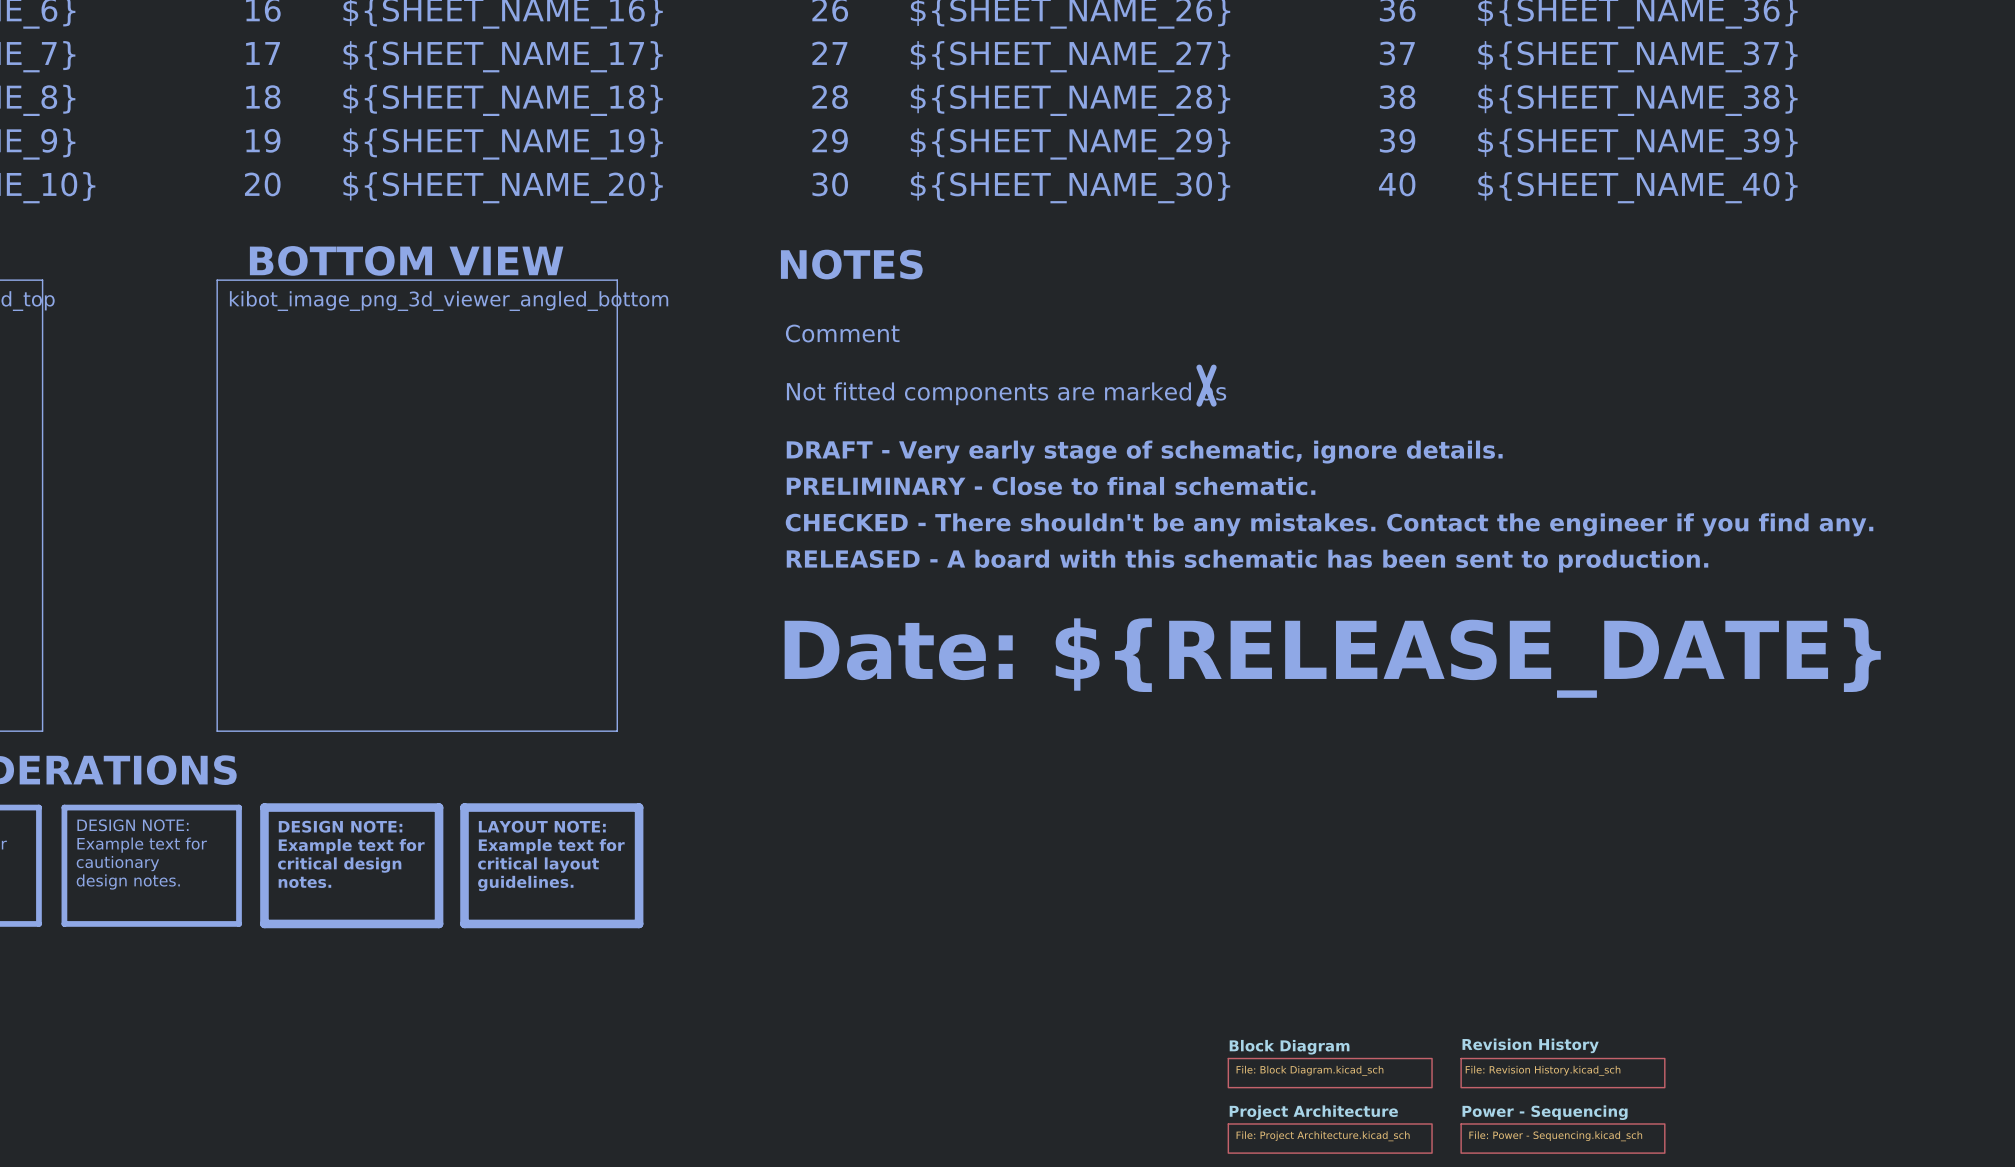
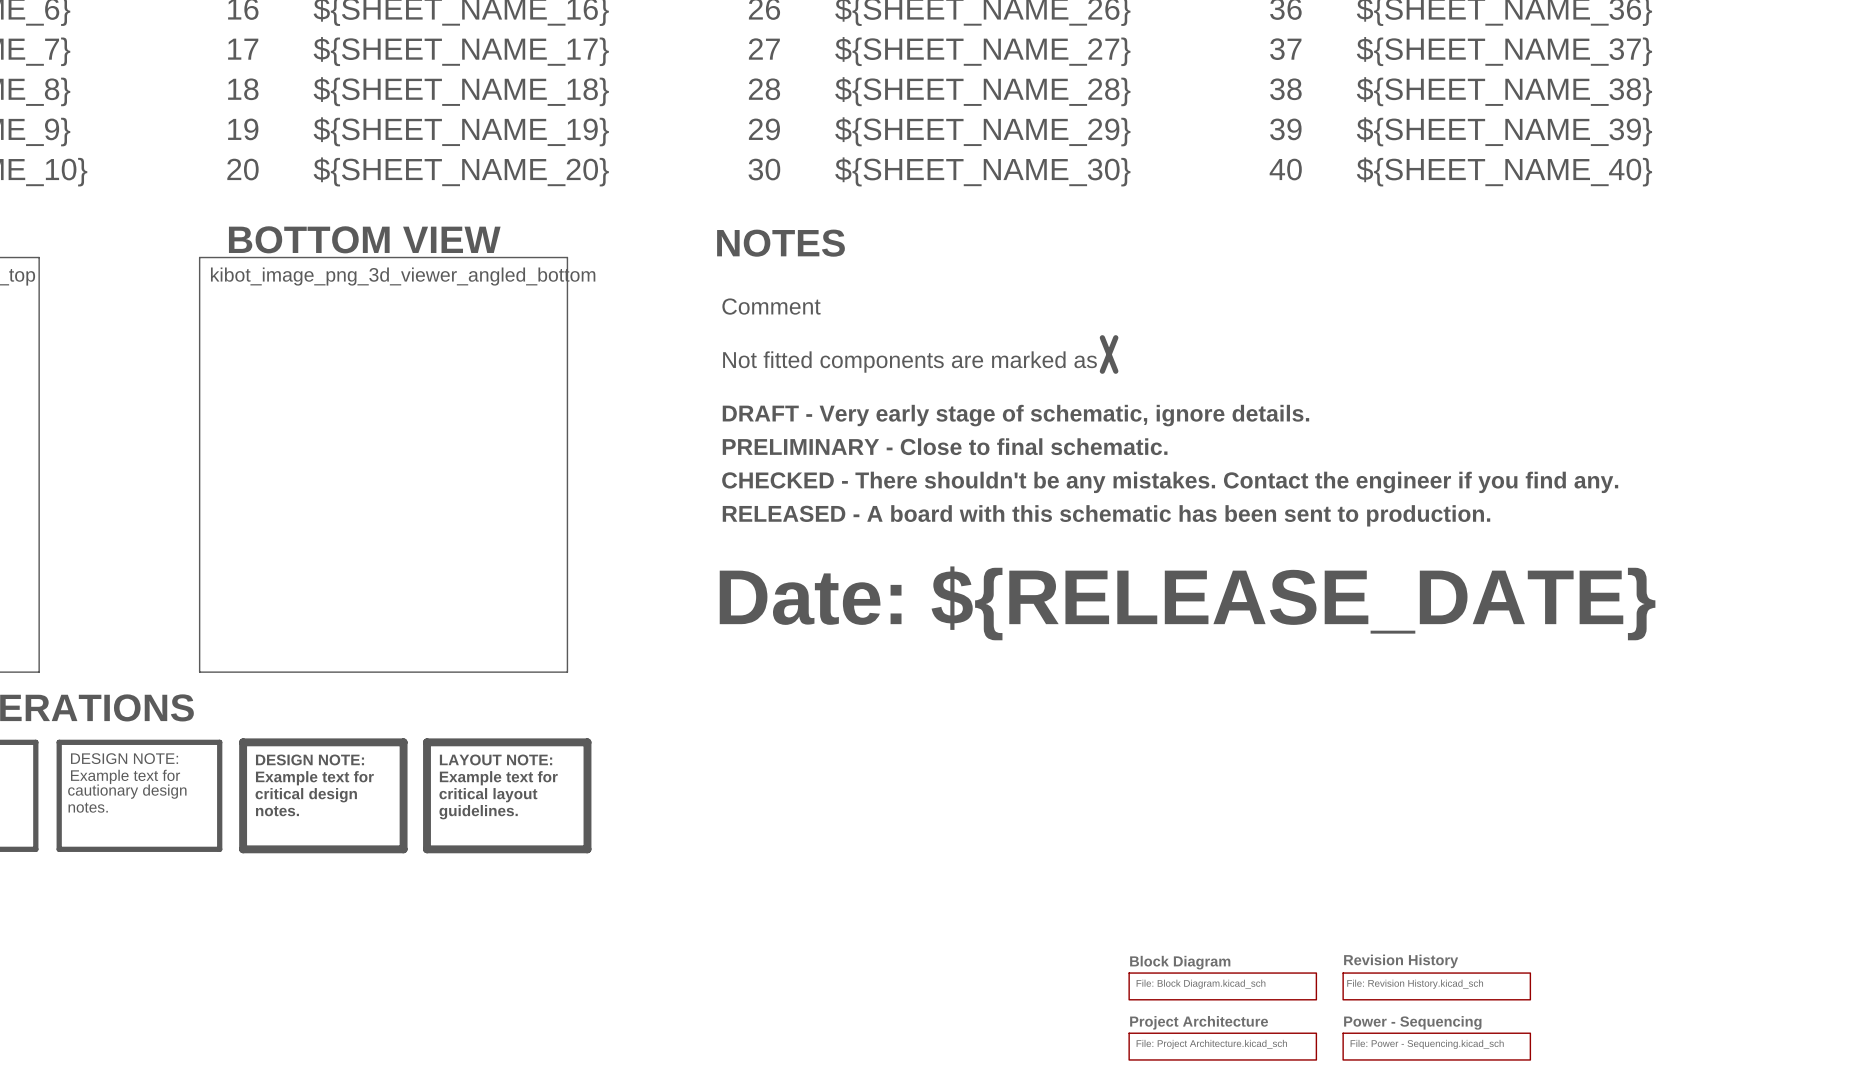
text: cautionary (117, 863) -> cautionary design (127, 791)
text: design notes. (128, 882) -> notes. (88, 807)

